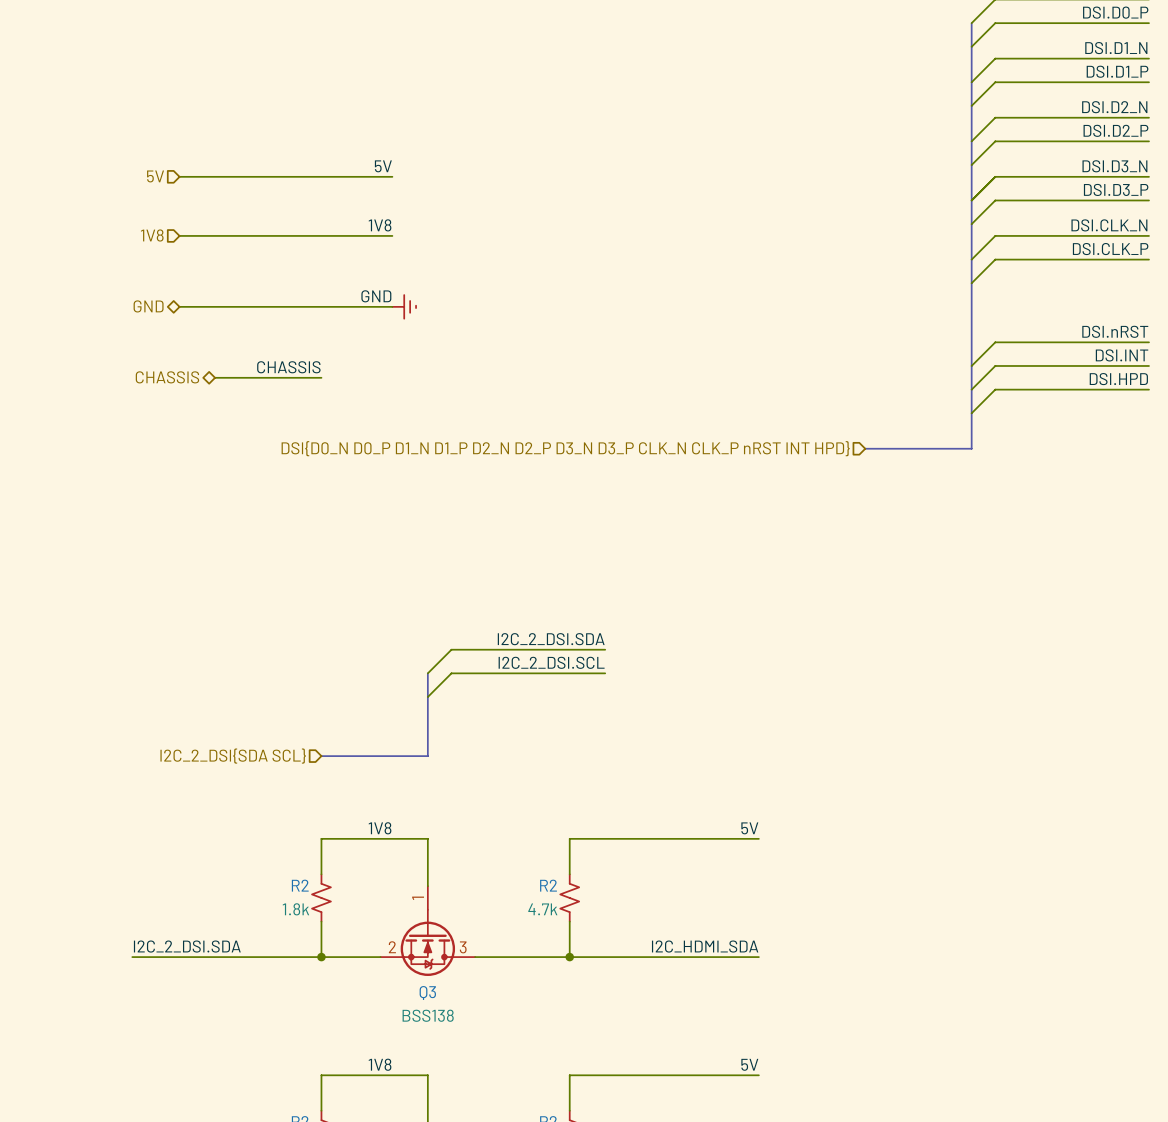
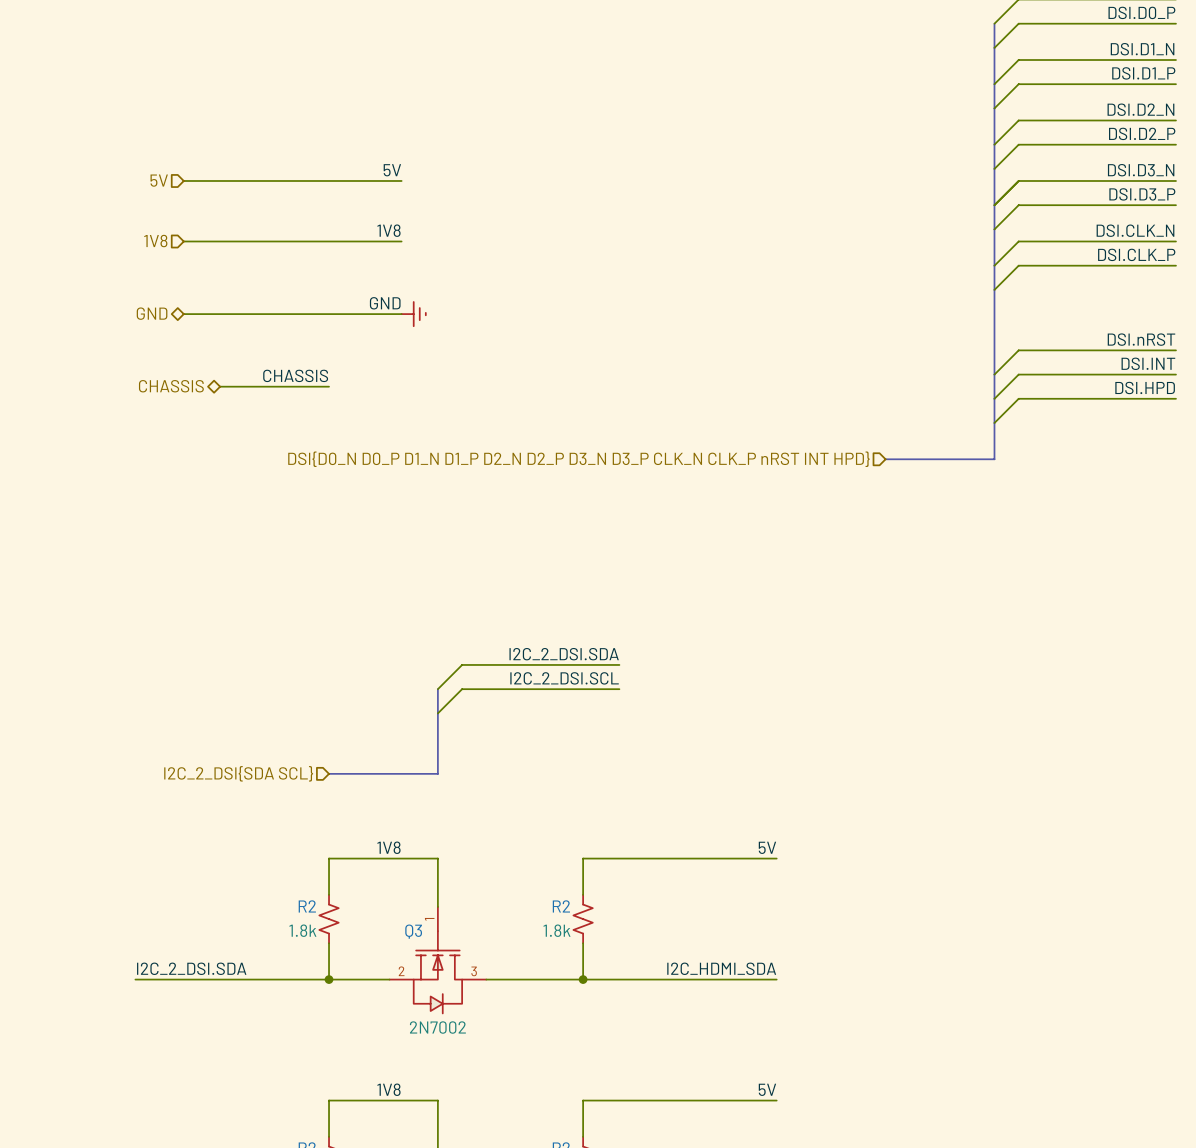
Q3 symbol: [380, 886, 476, 976] -> [389, 906, 487, 1014]
R2 value: 4.7k (542, 909) -> 1.8k (556, 930)
Q3 name position: Q3 (427, 993) -> Q3 (413, 931)
Q3 value: BSS138 (428, 1015) -> 2N7002 (437, 1027)

